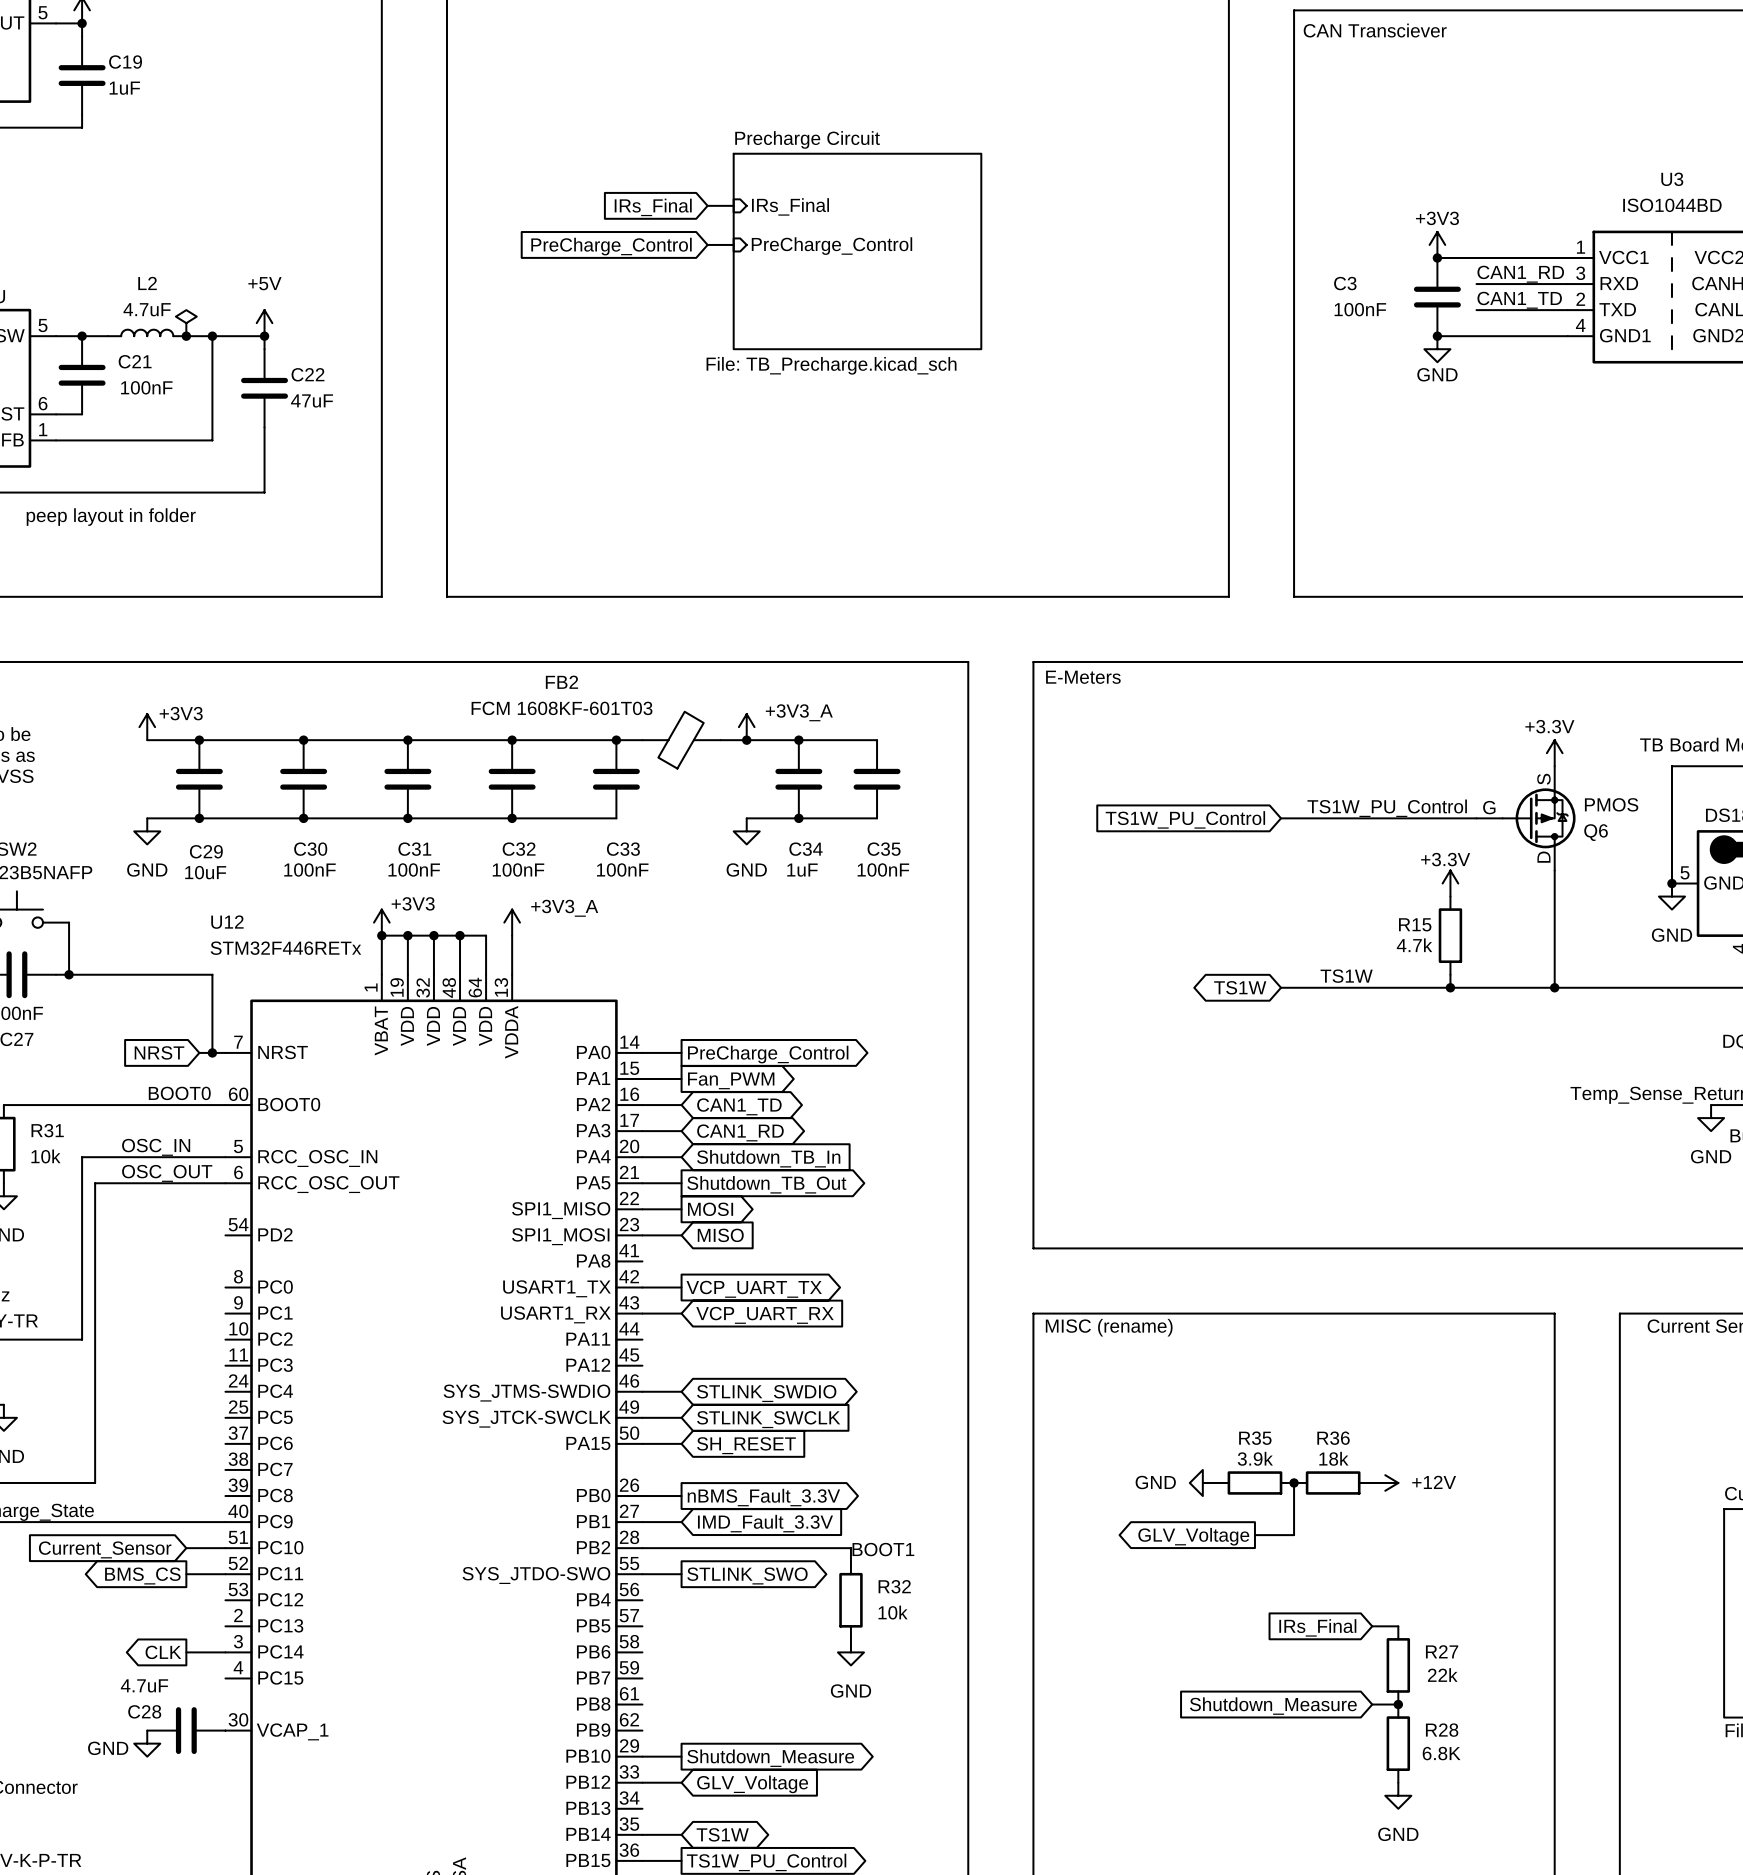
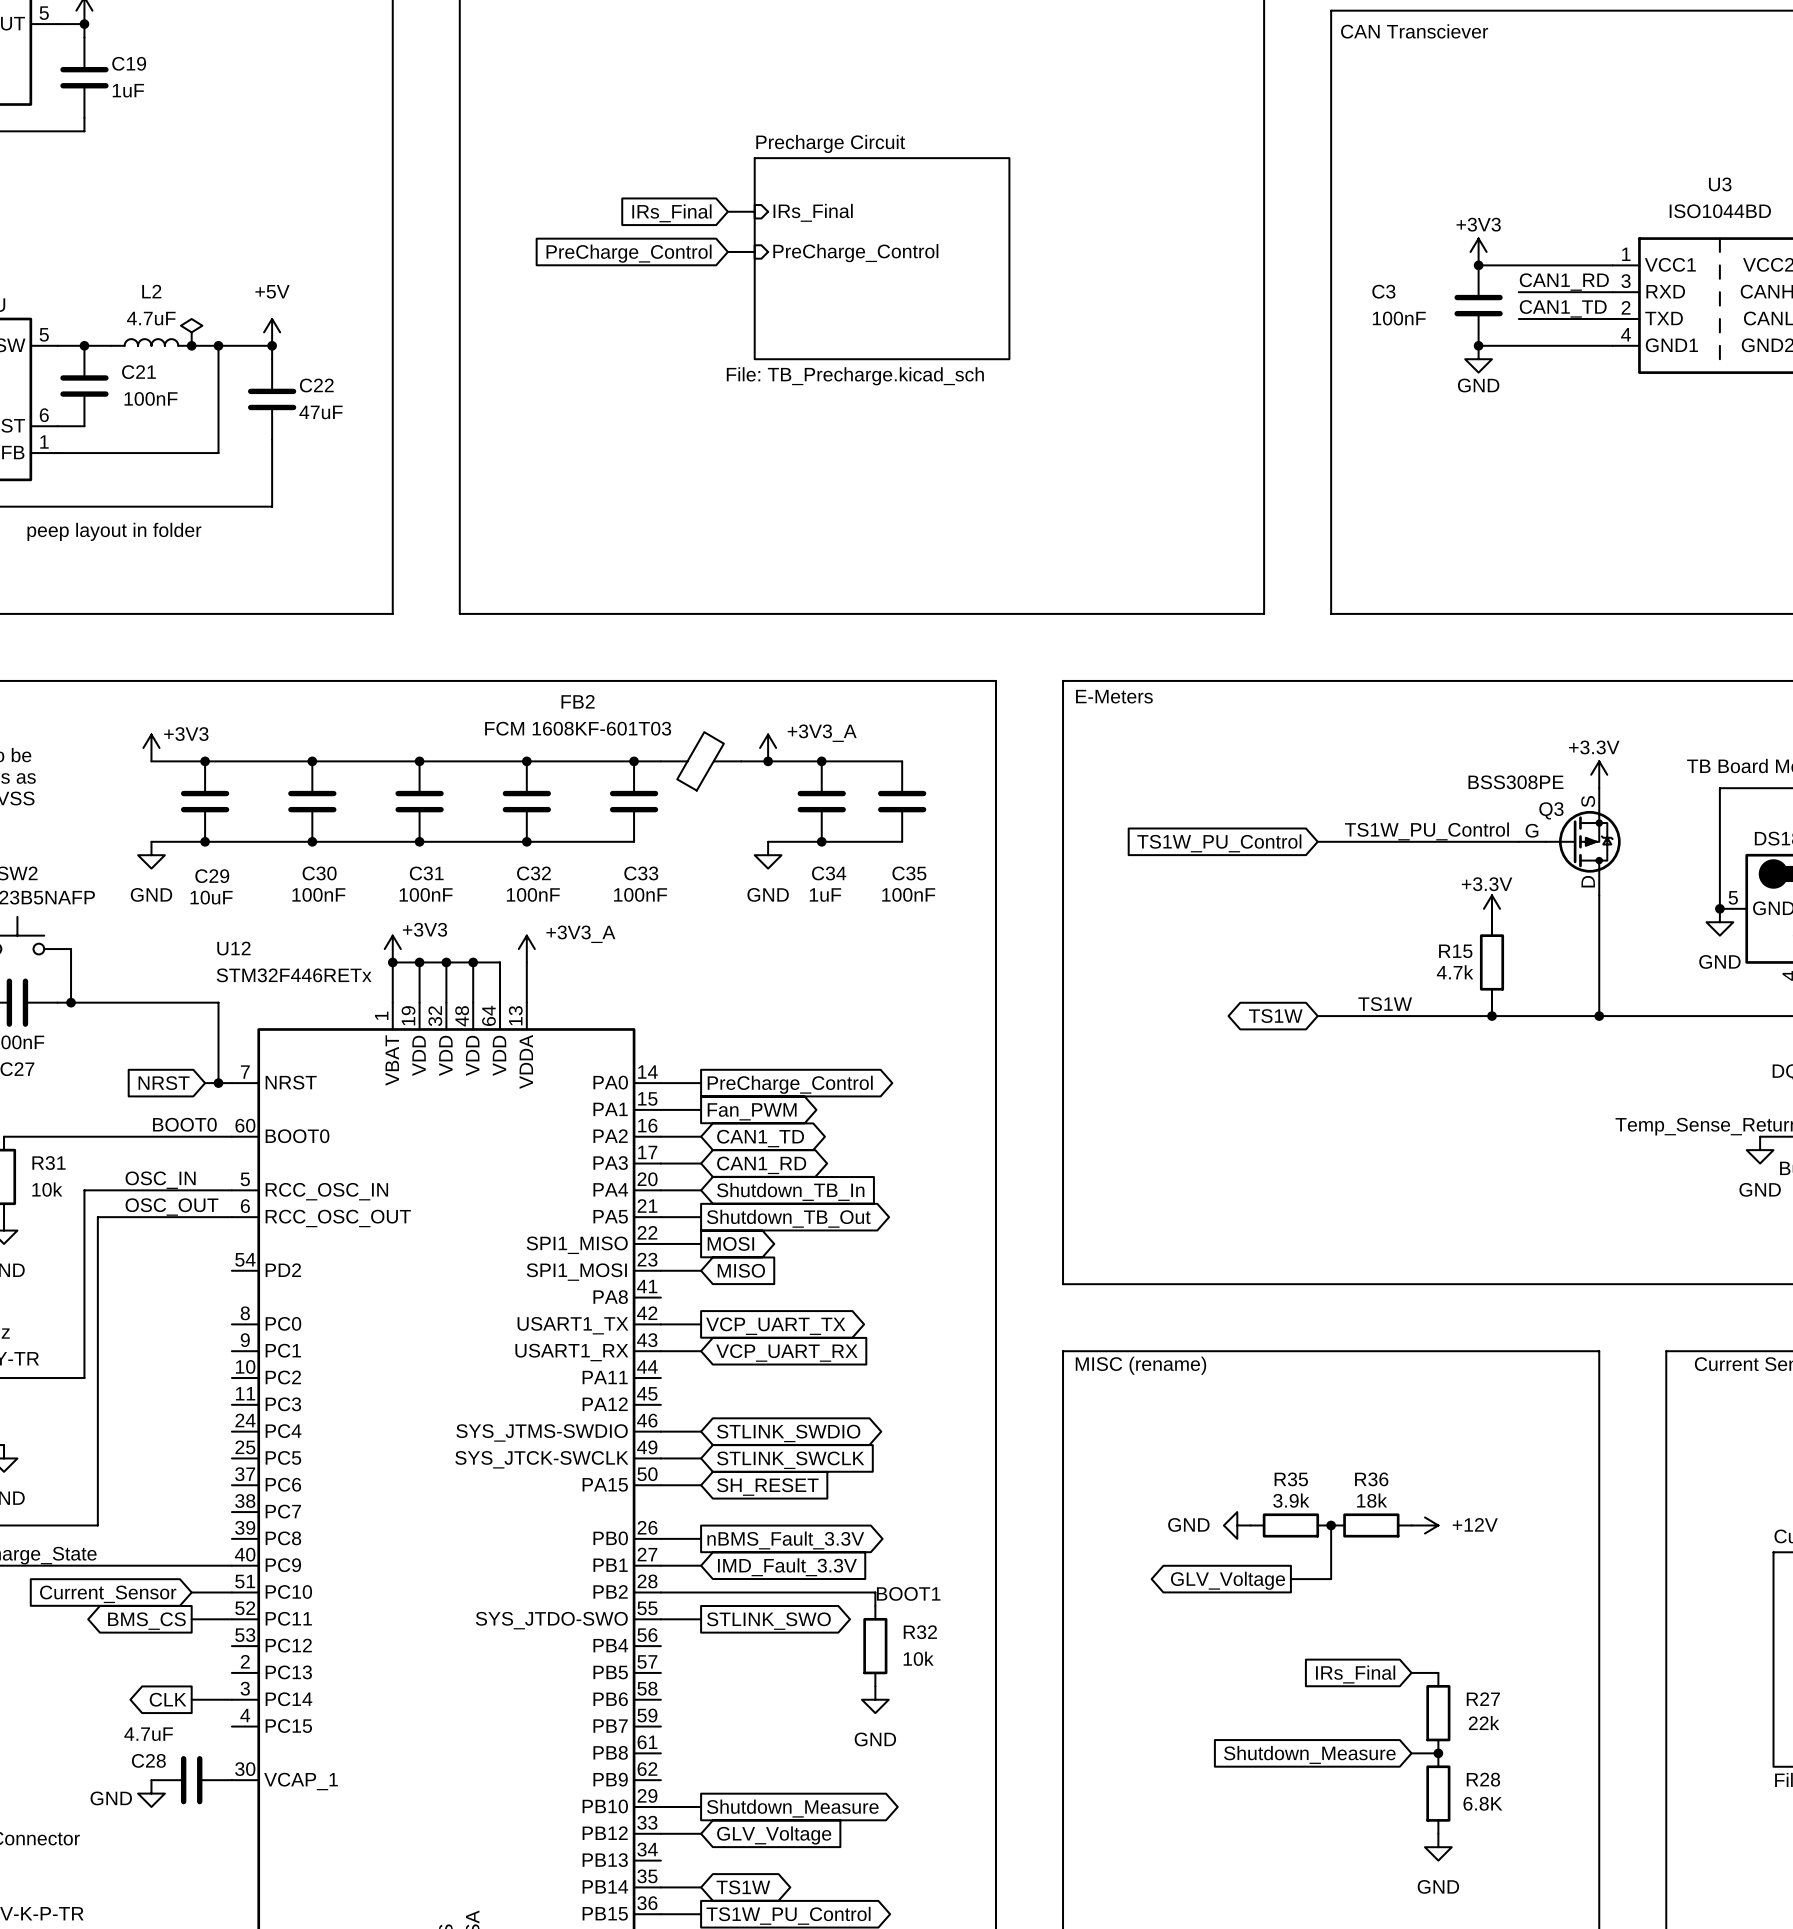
Q6 value: PMOS (1611, 804) -> BSS308PE (1516, 782)
Q6 name: Q6 (1596, 832) -> Q3 (1551, 810)

